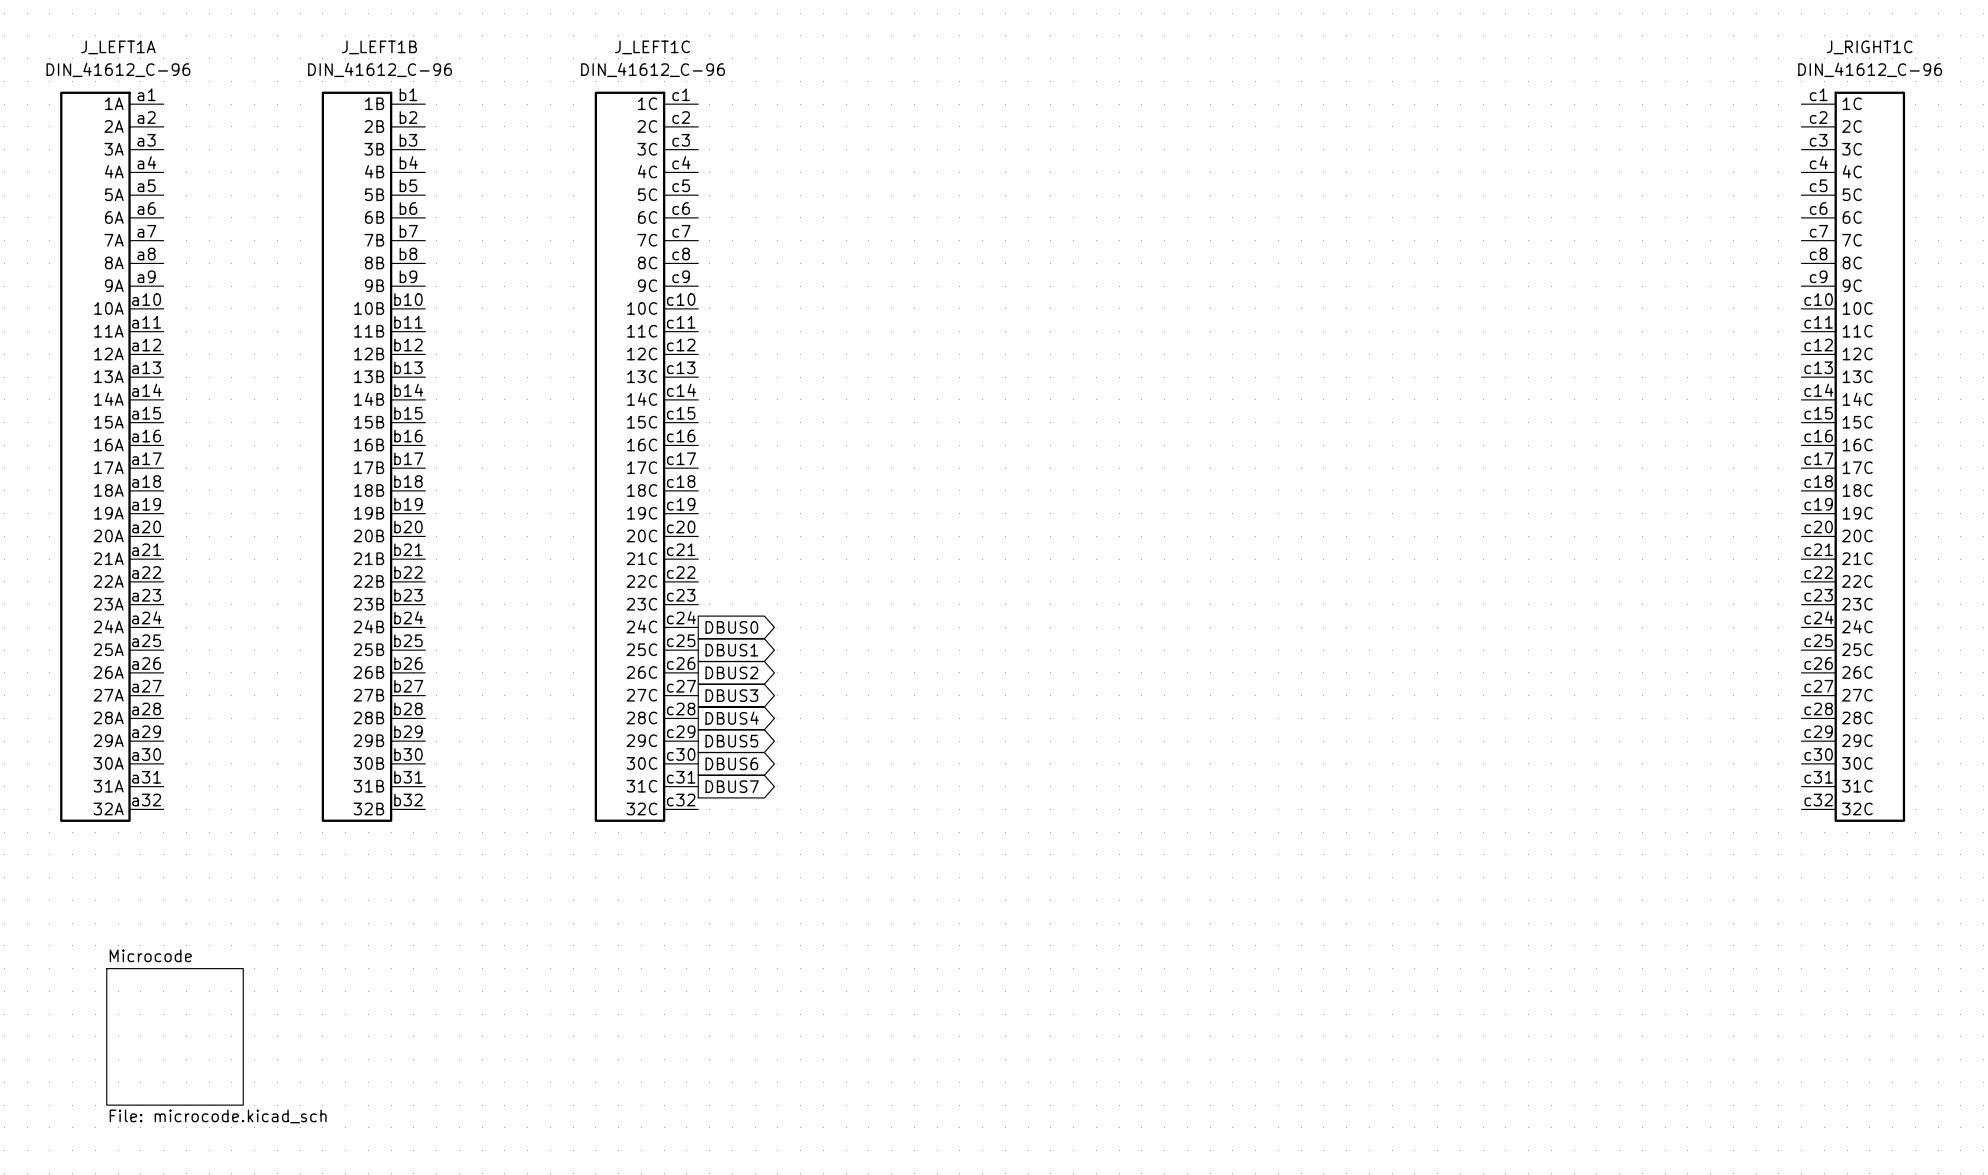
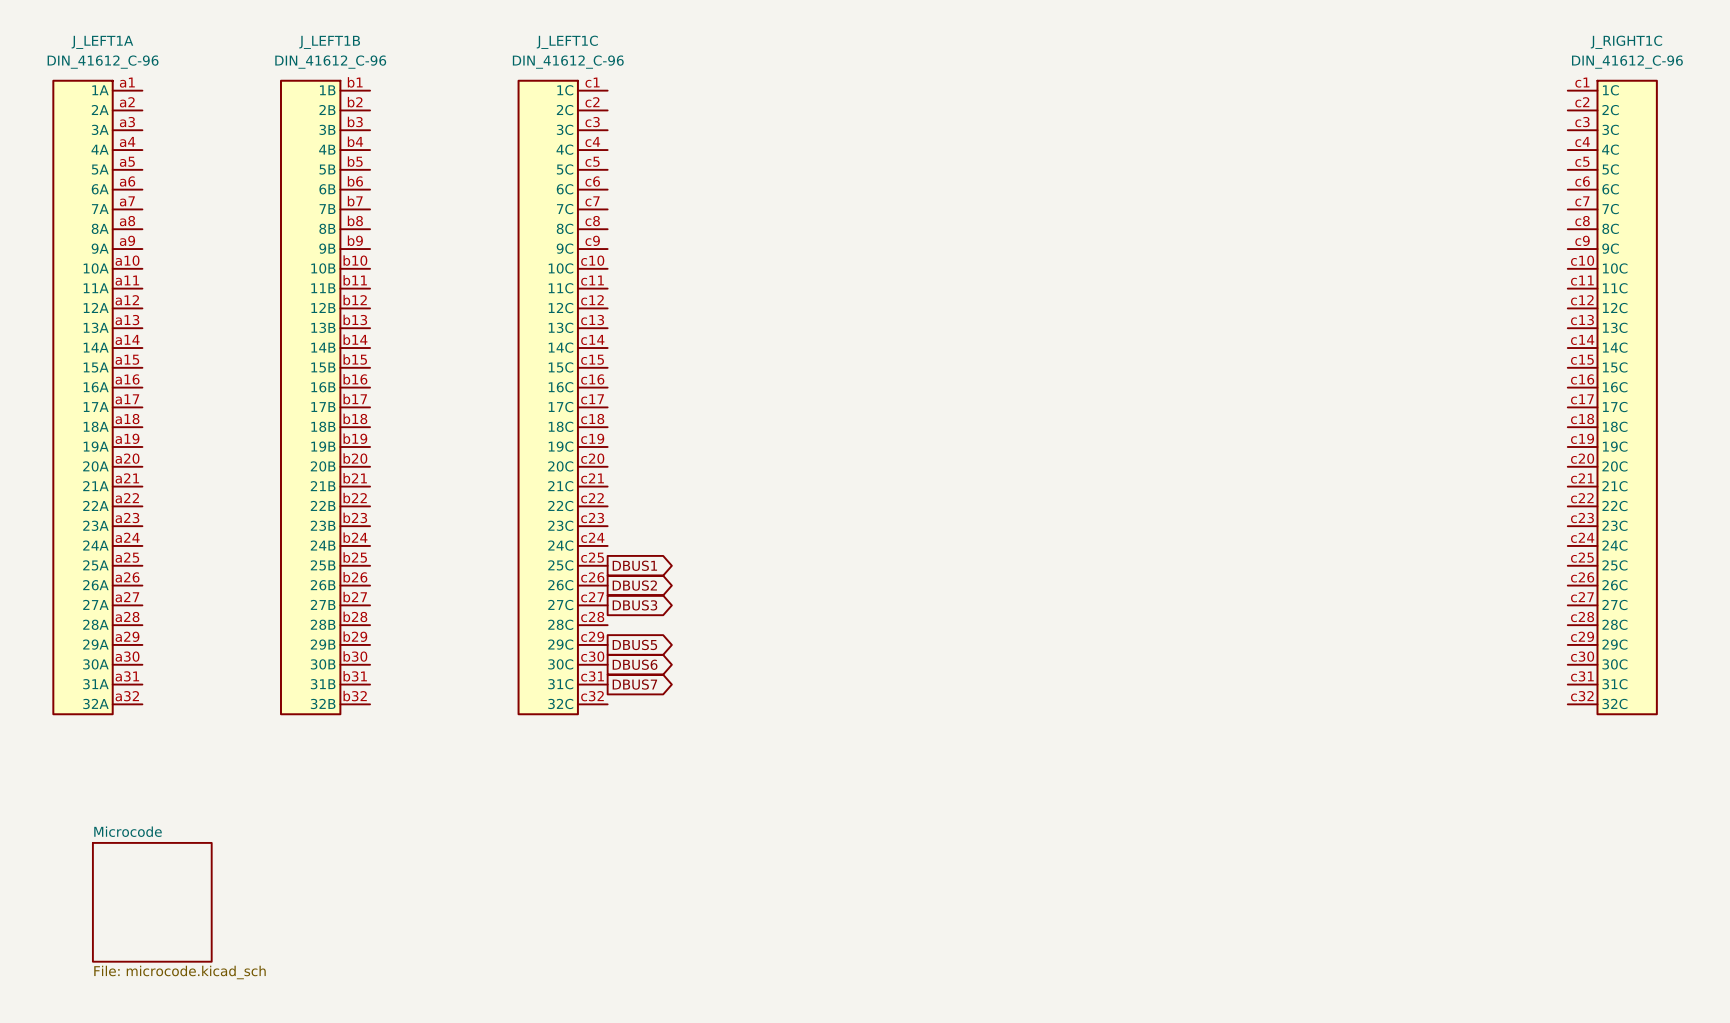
global label: DBUS0 (731, 627) -> none
global label: DBUS4 (732, 718) -> none

